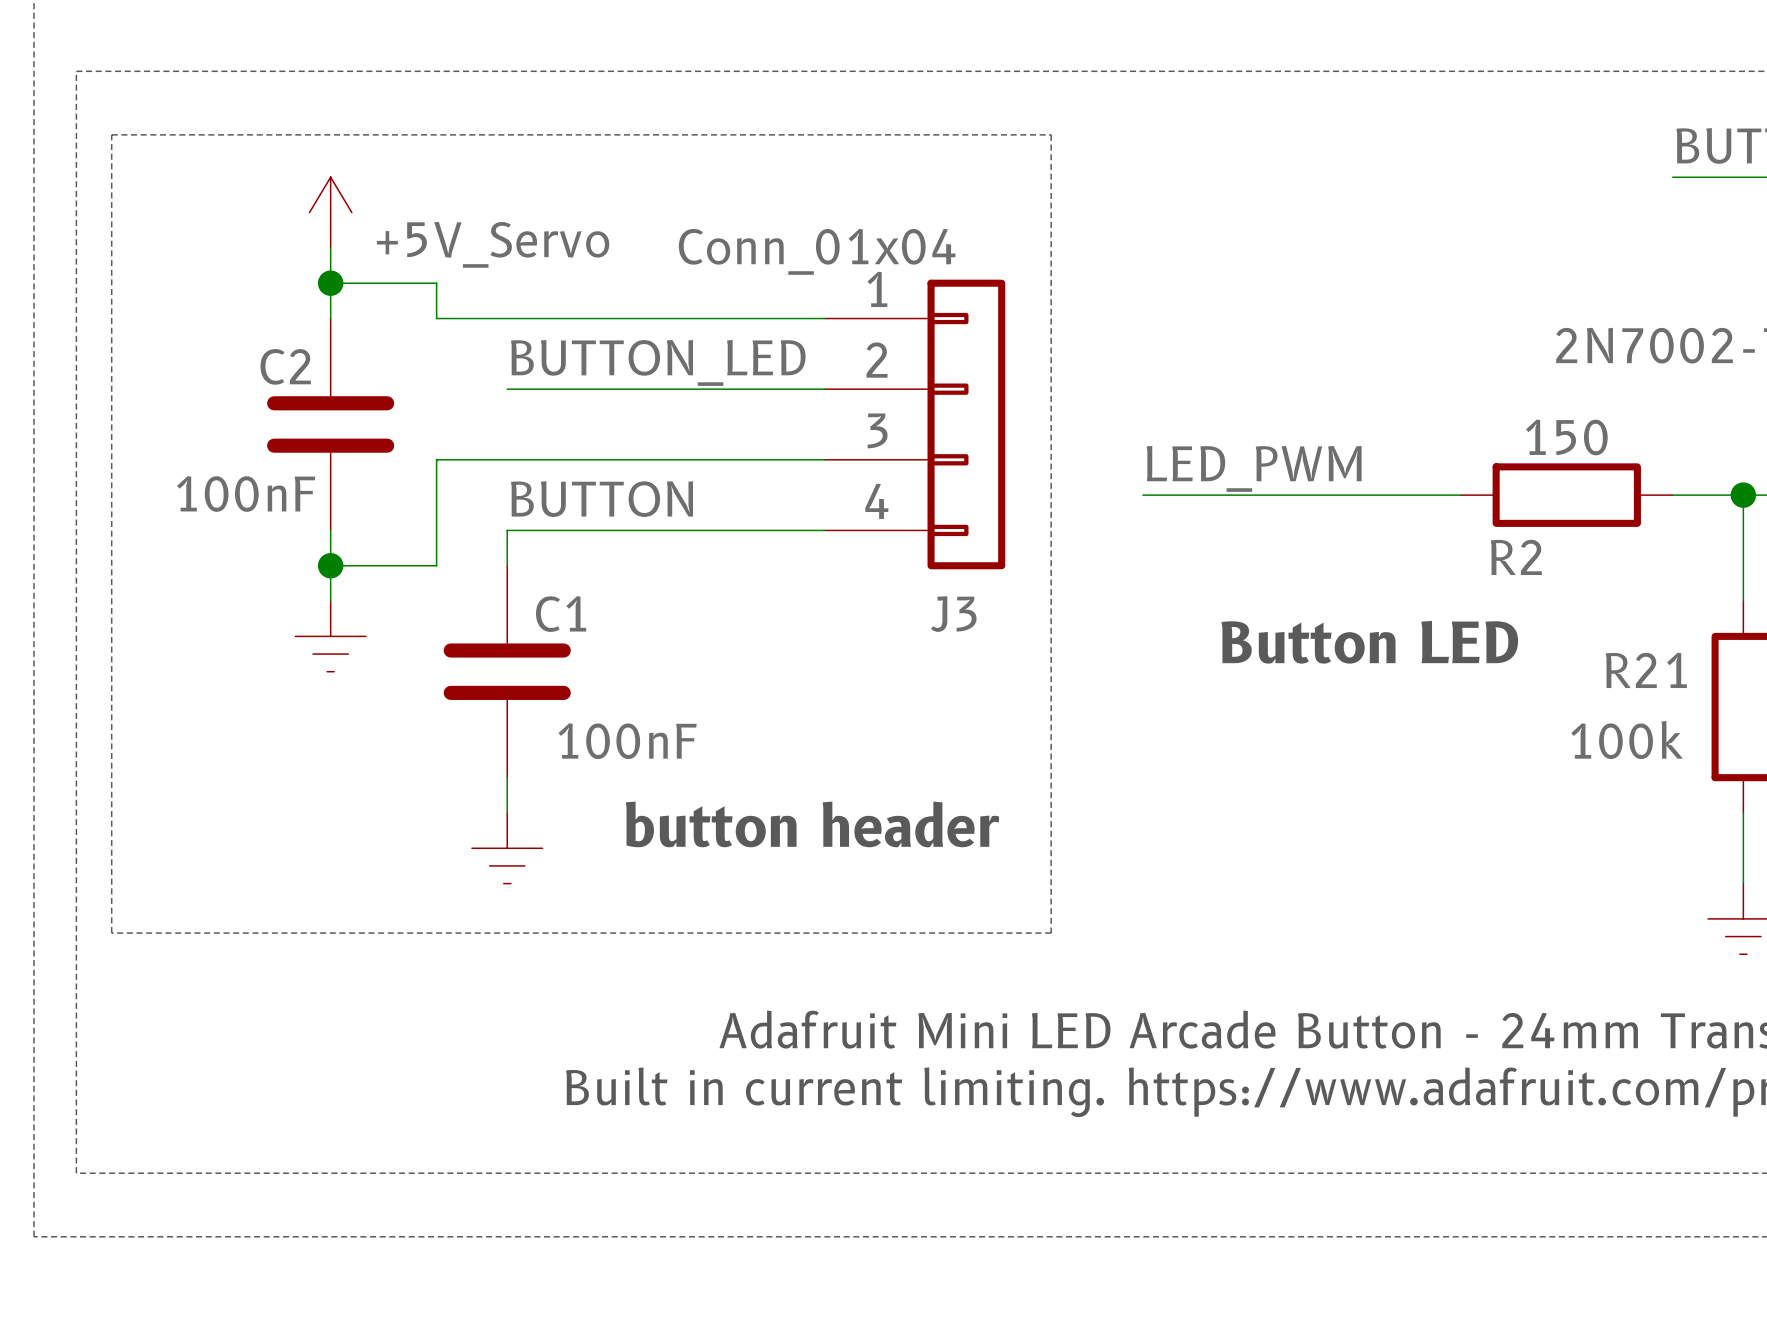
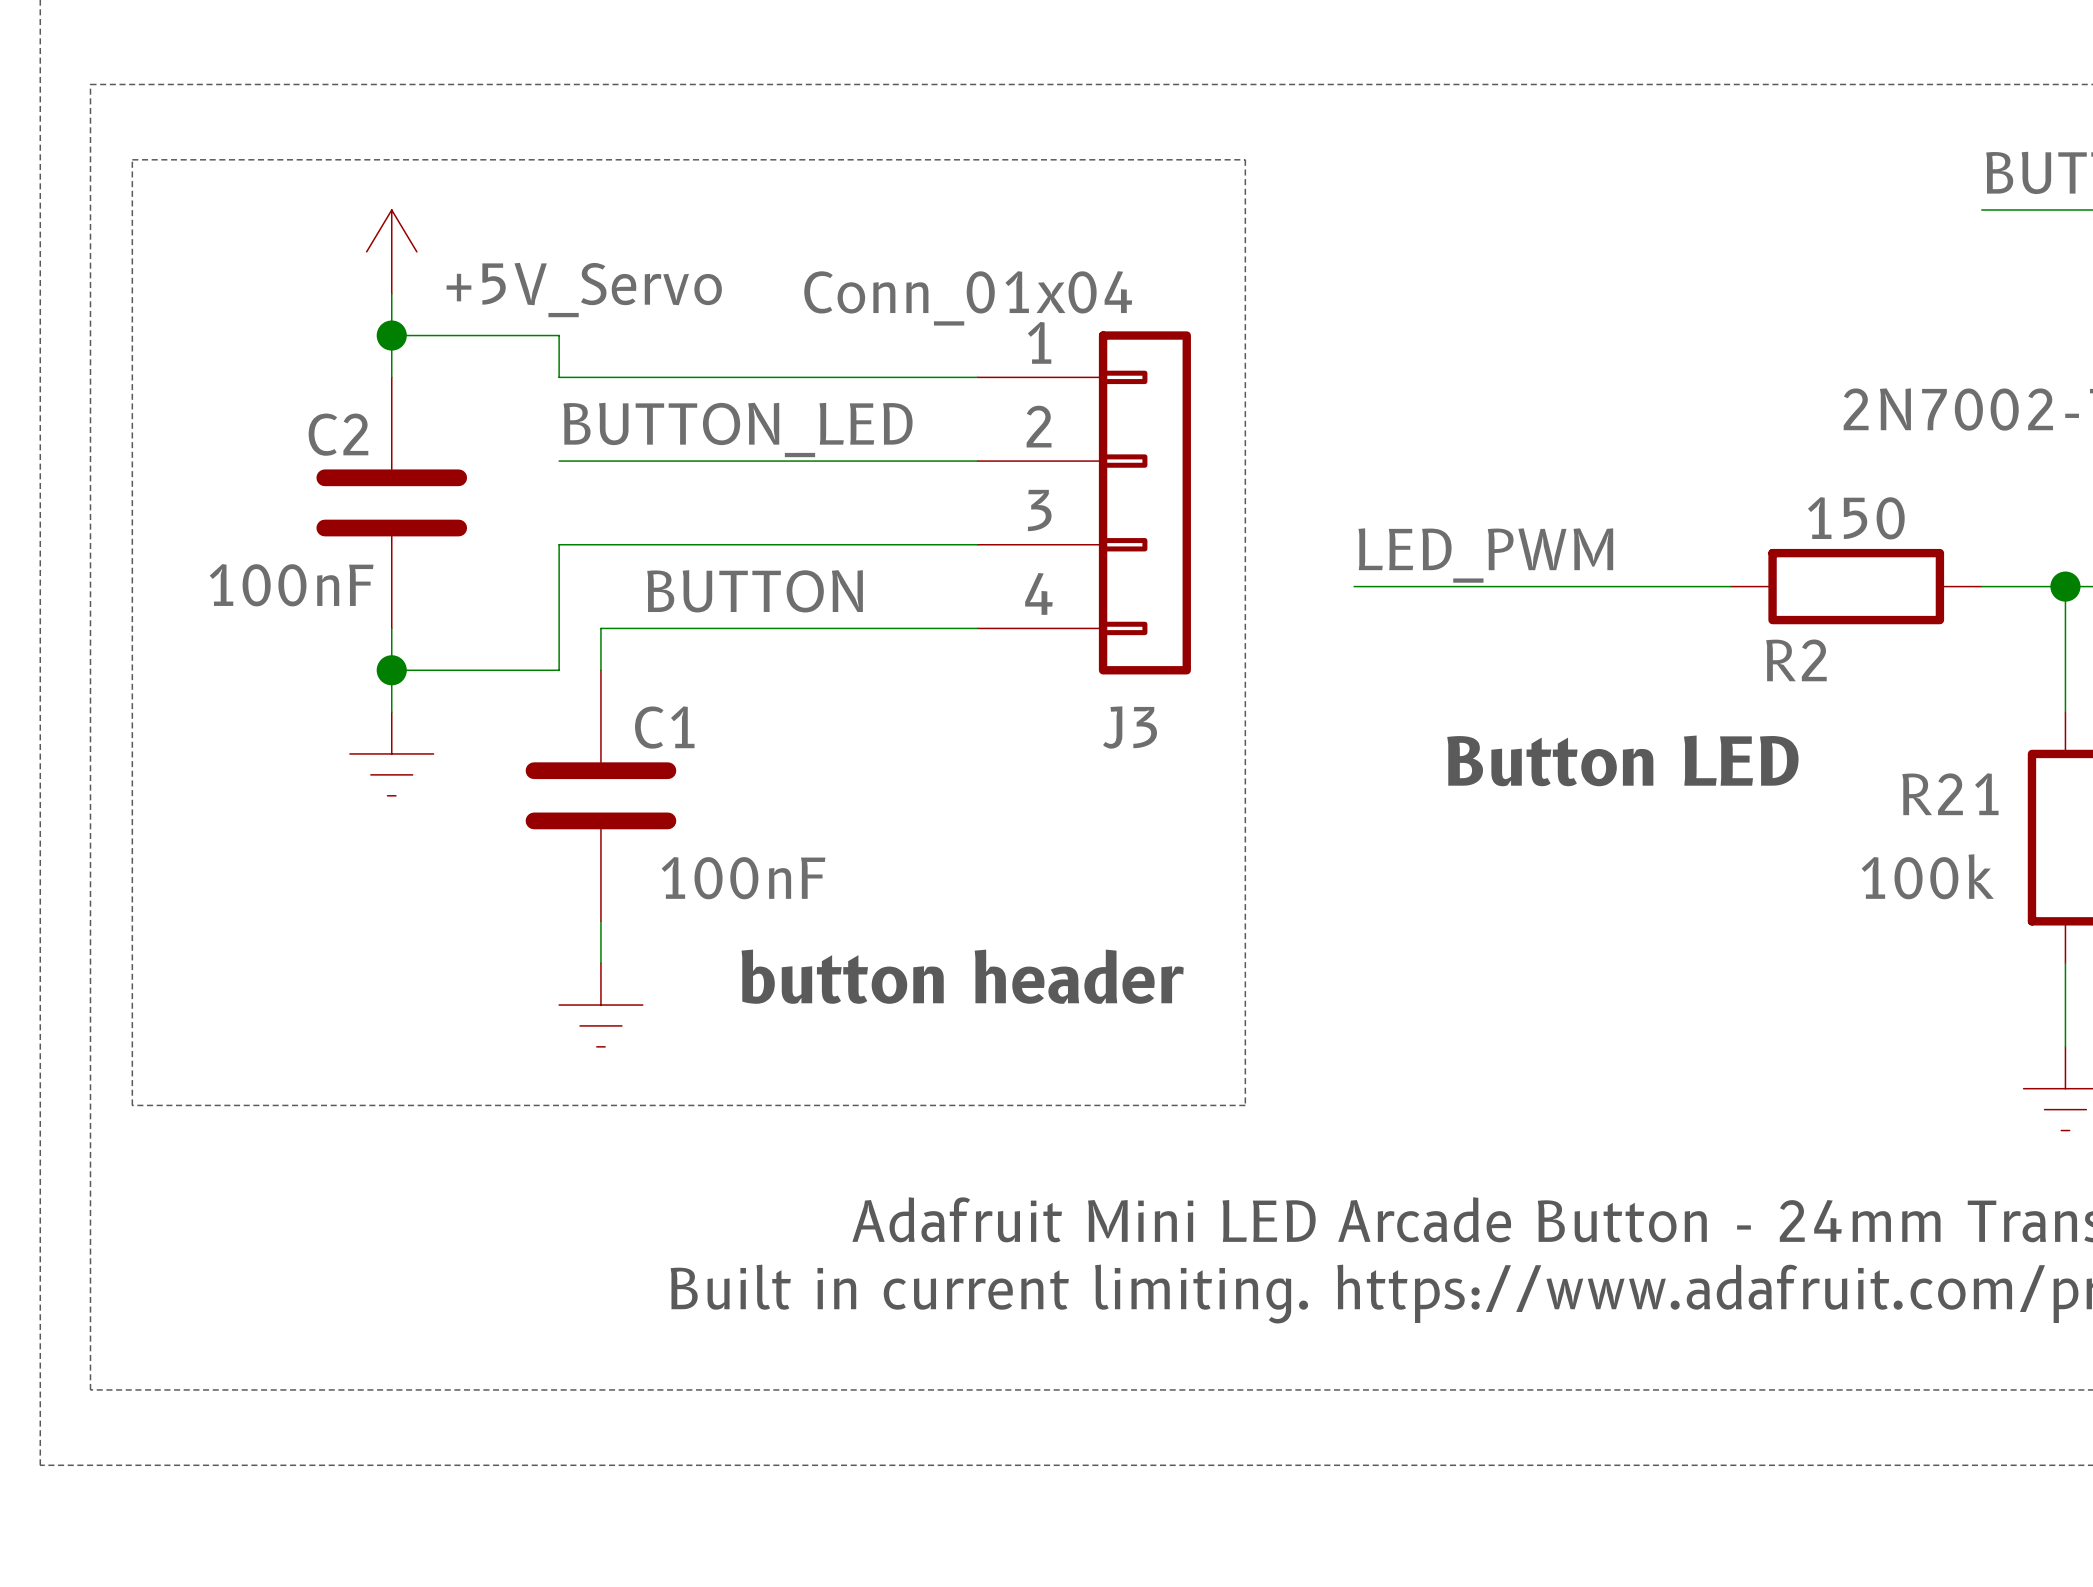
wire: (436, 283) (436, 318) (471, 318) -> (517, 335) (559, 335) (559, 377)
label position: BUTTON_LED (658, 362) -> BUTTON_LED (738, 429)
wire: none -> (559, 461) (600, 461)
wire: (471, 459) (436, 459) (436, 565) -> (559, 544) (559, 670) (517, 670)
label position: BUTTON (601, 499) -> BUTTON (755, 591)

